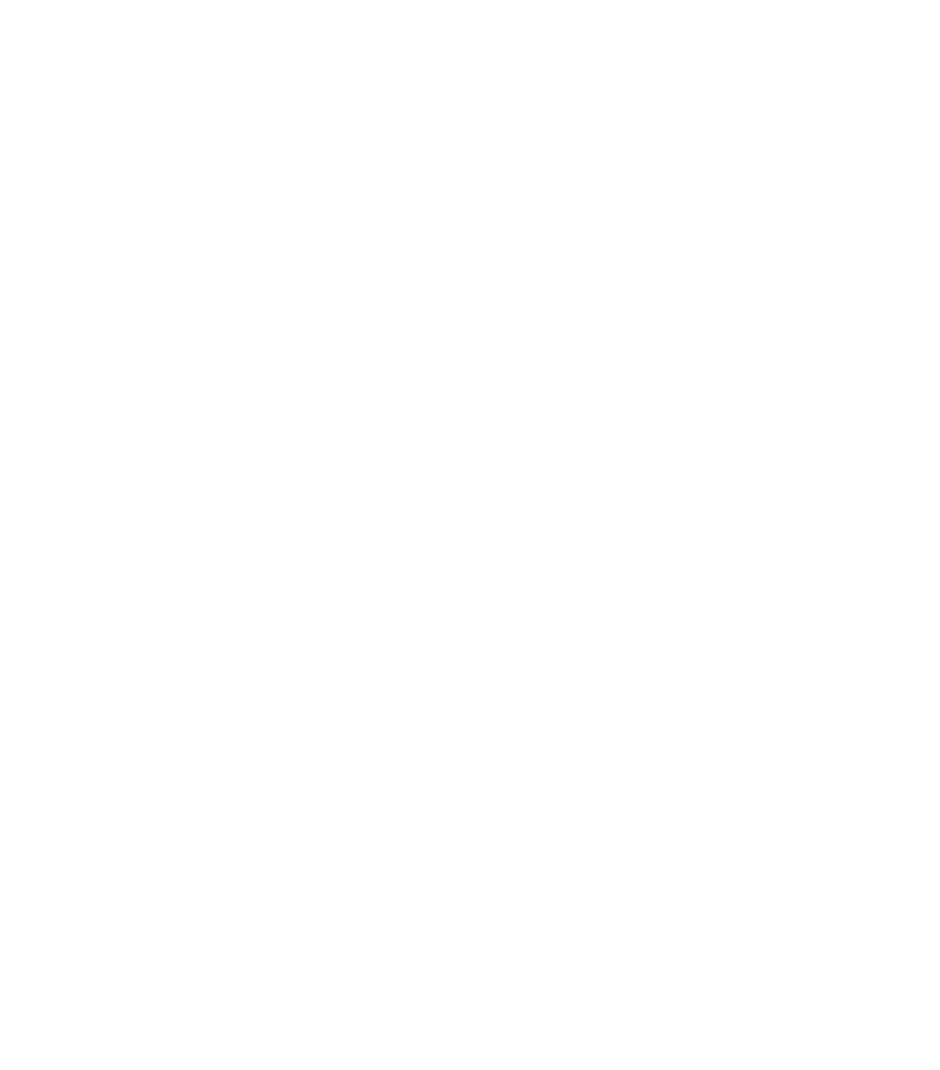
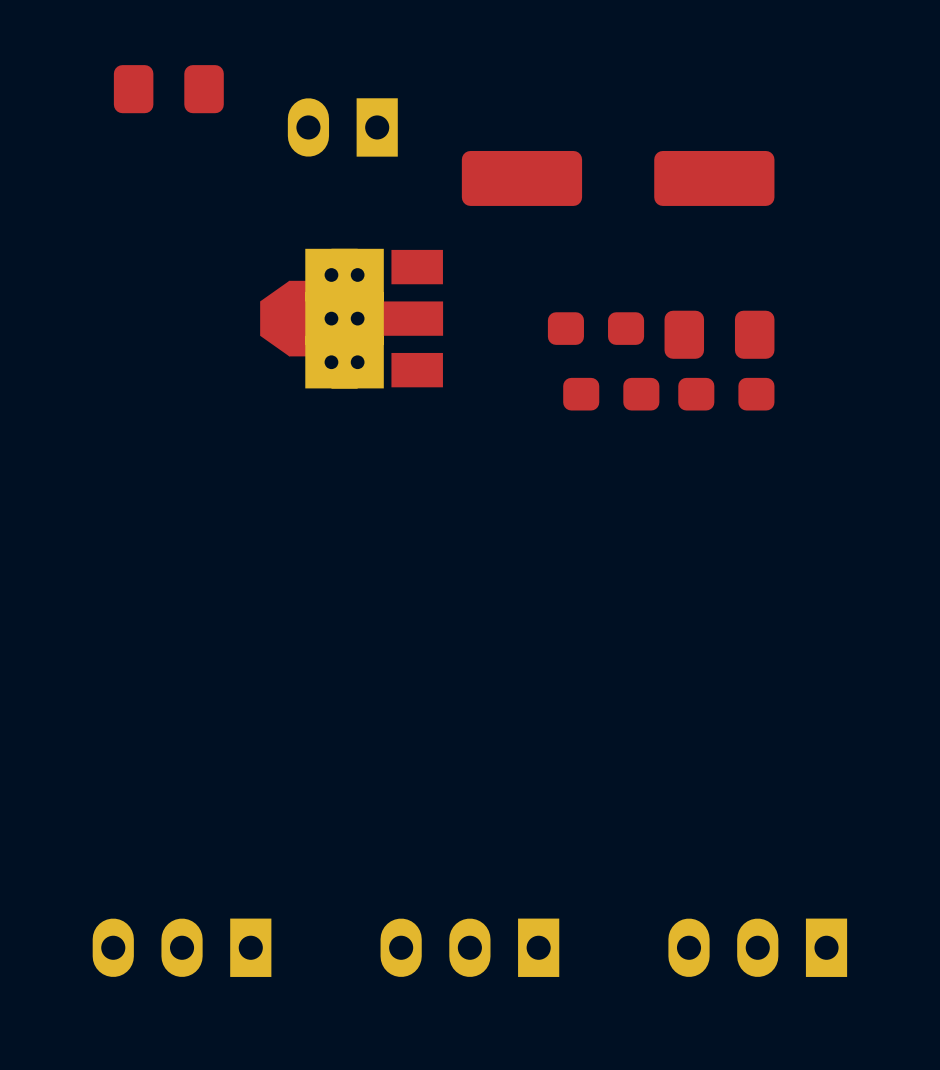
part: none -> (168, 89)
part: none -> (342, 127)
part: none -> (618, 178)
part: none -> (351, 318)
part: none -> (596, 328)
part: none -> (719, 334)
part: none -> (611, 394)
part: none -> (726, 394)
part: none -> (182, 947)
part: none -> (469, 947)
part: none -> (757, 947)

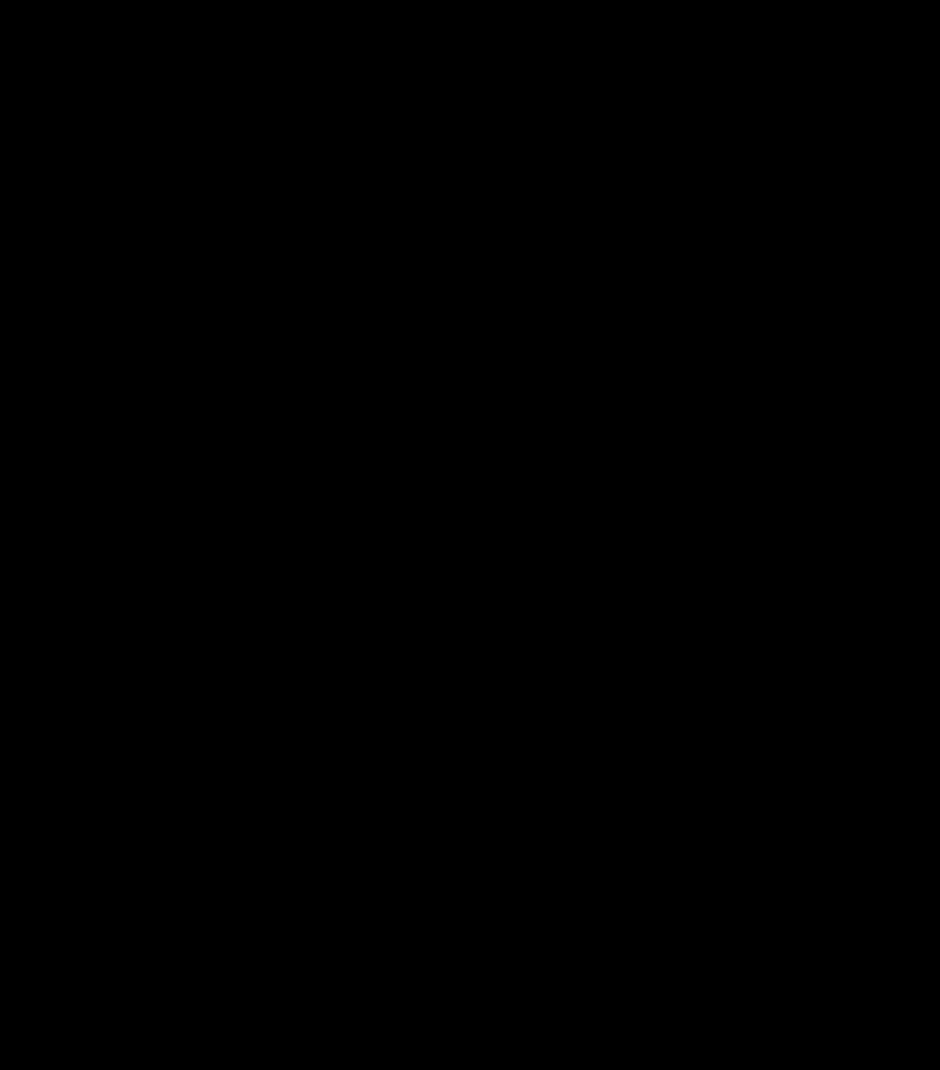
part: (168, 89) -> none
part: (342, 127) -> none
part: (618, 178) -> none
part: (351, 318) -> none
part: (596, 328) -> none
part: (719, 334) -> none
part: (611, 394) -> none
part: (726, 394) -> none
part: (182, 947) -> none
part: (469, 947) -> none
part: (757, 947) -> none

